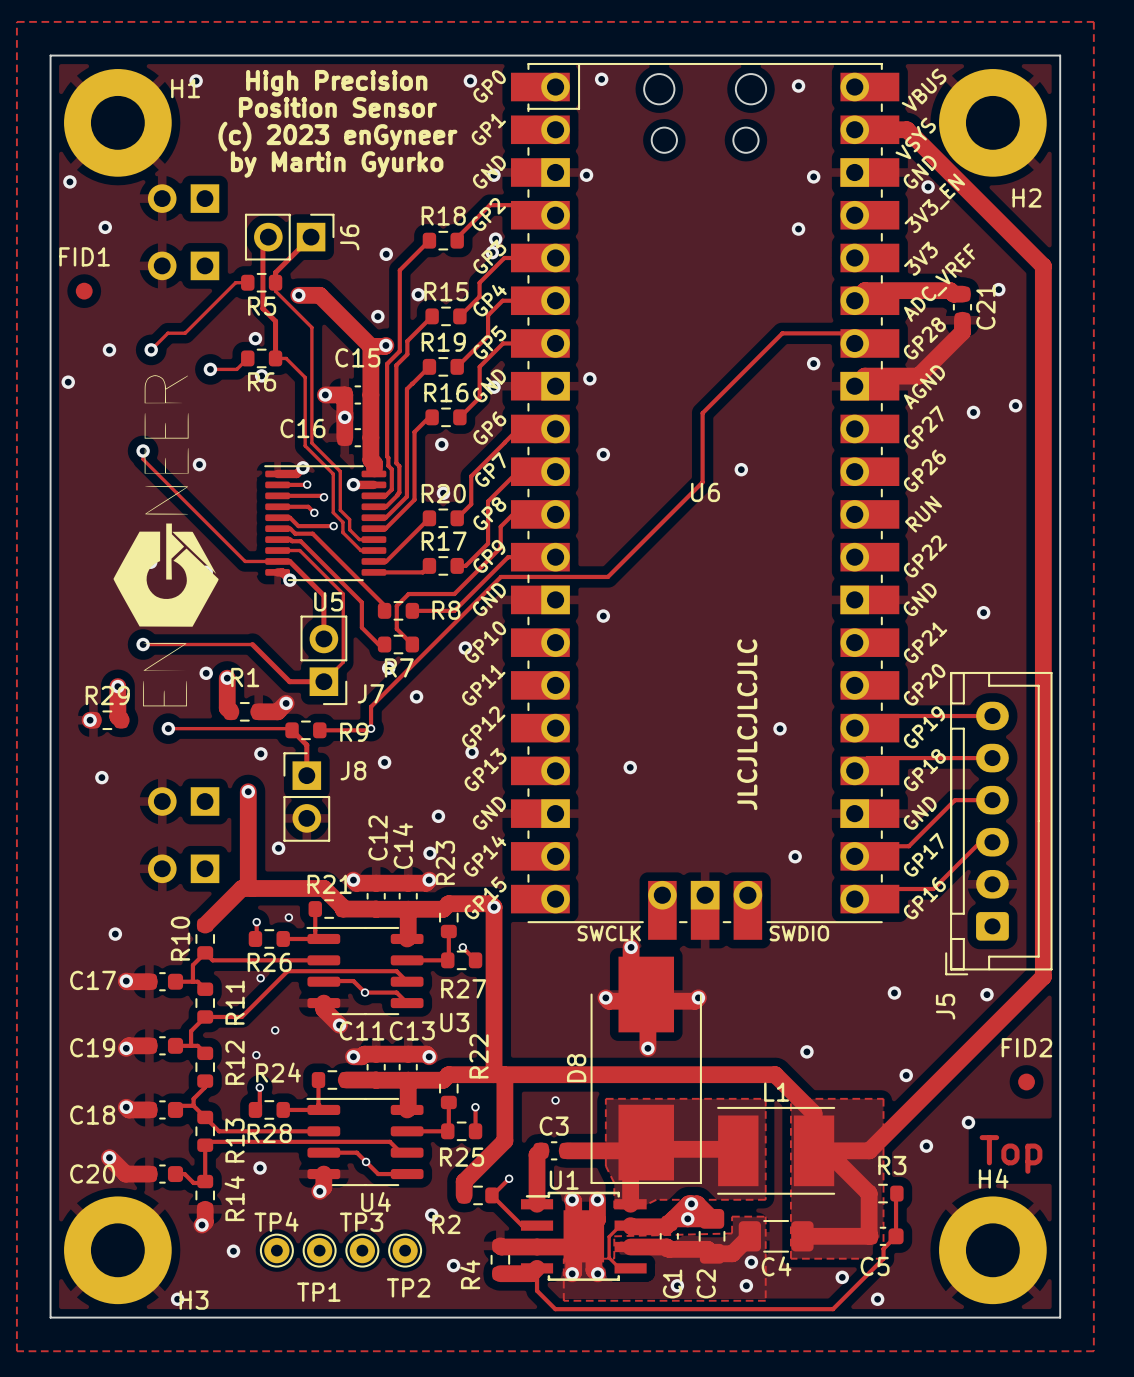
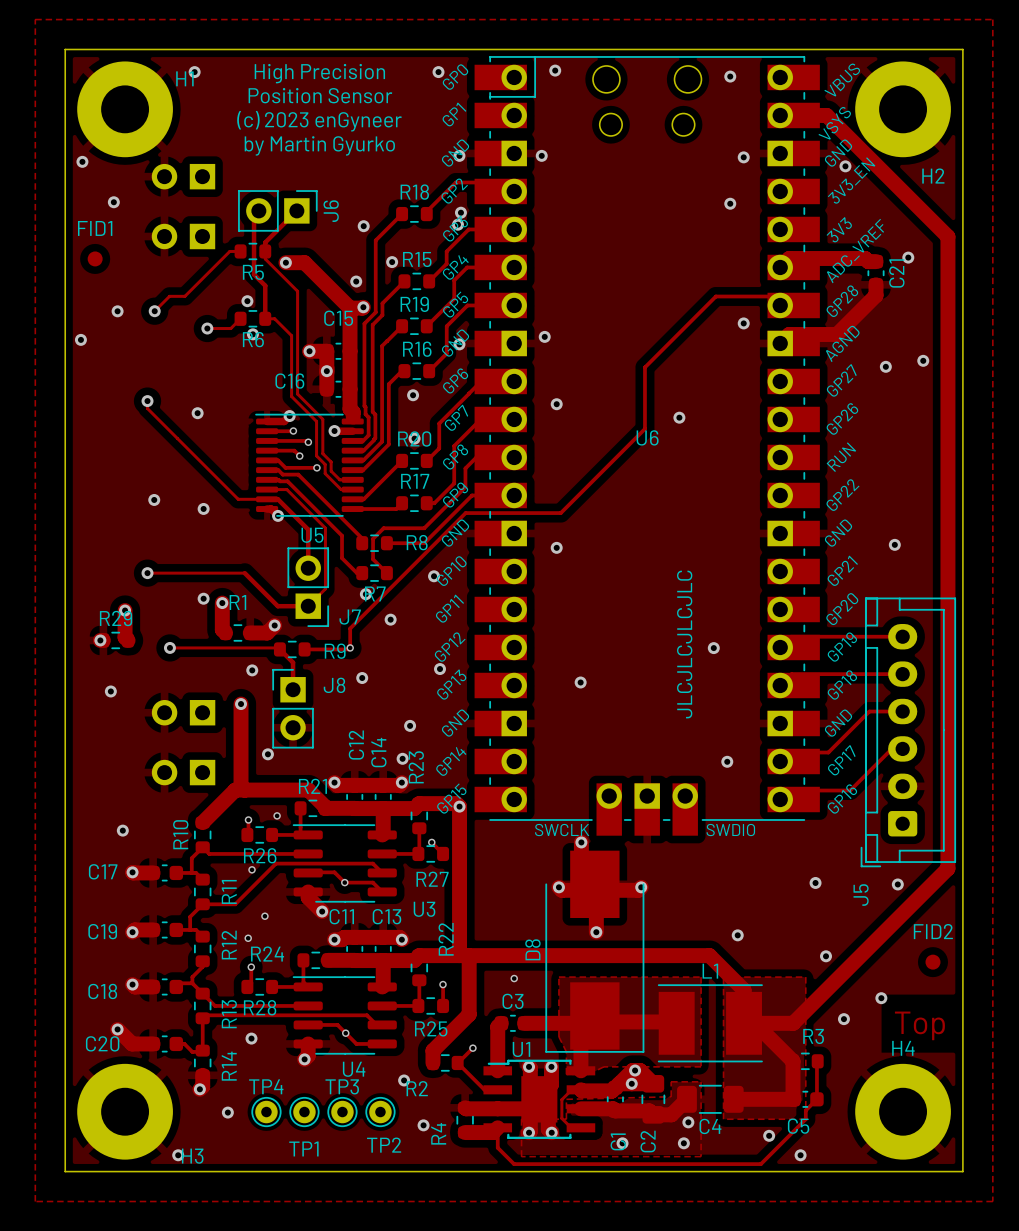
drawing: [113, 375, 219, 707] -> none

